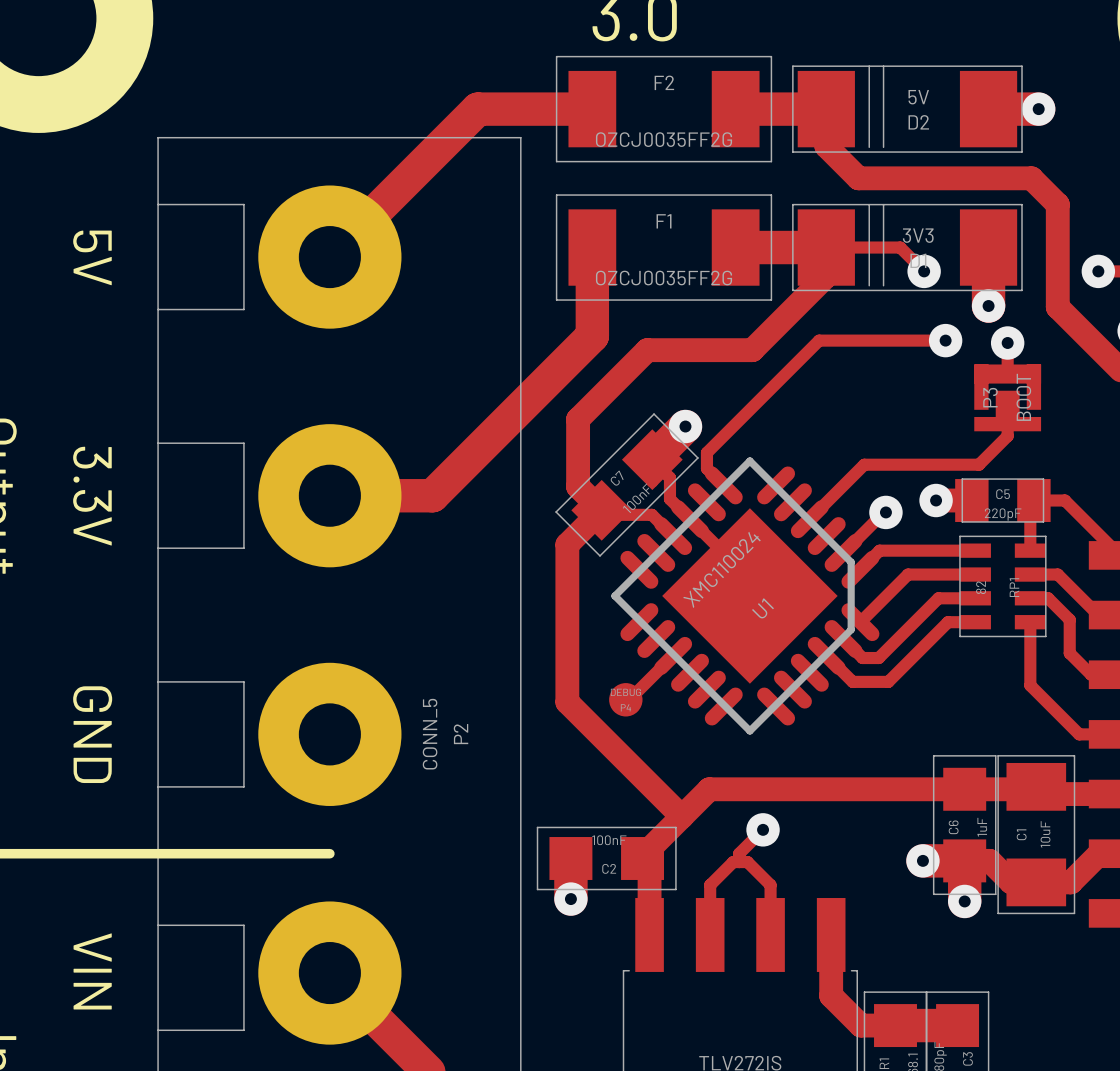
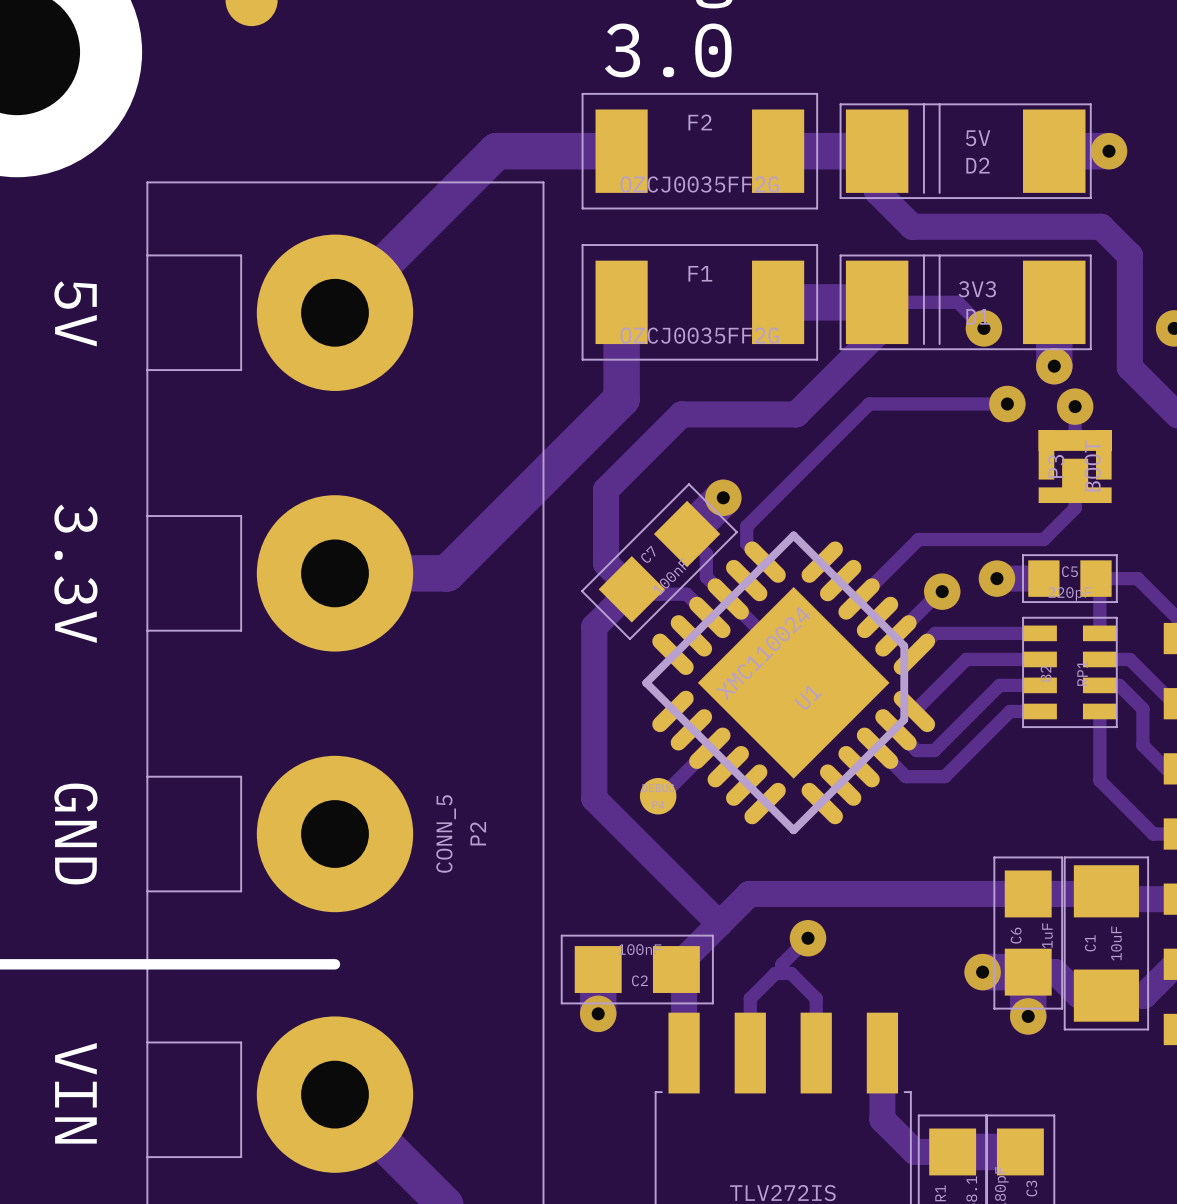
C5 footprint: [955, 479, 1051, 522] -> [1022, 554, 1118, 603]

